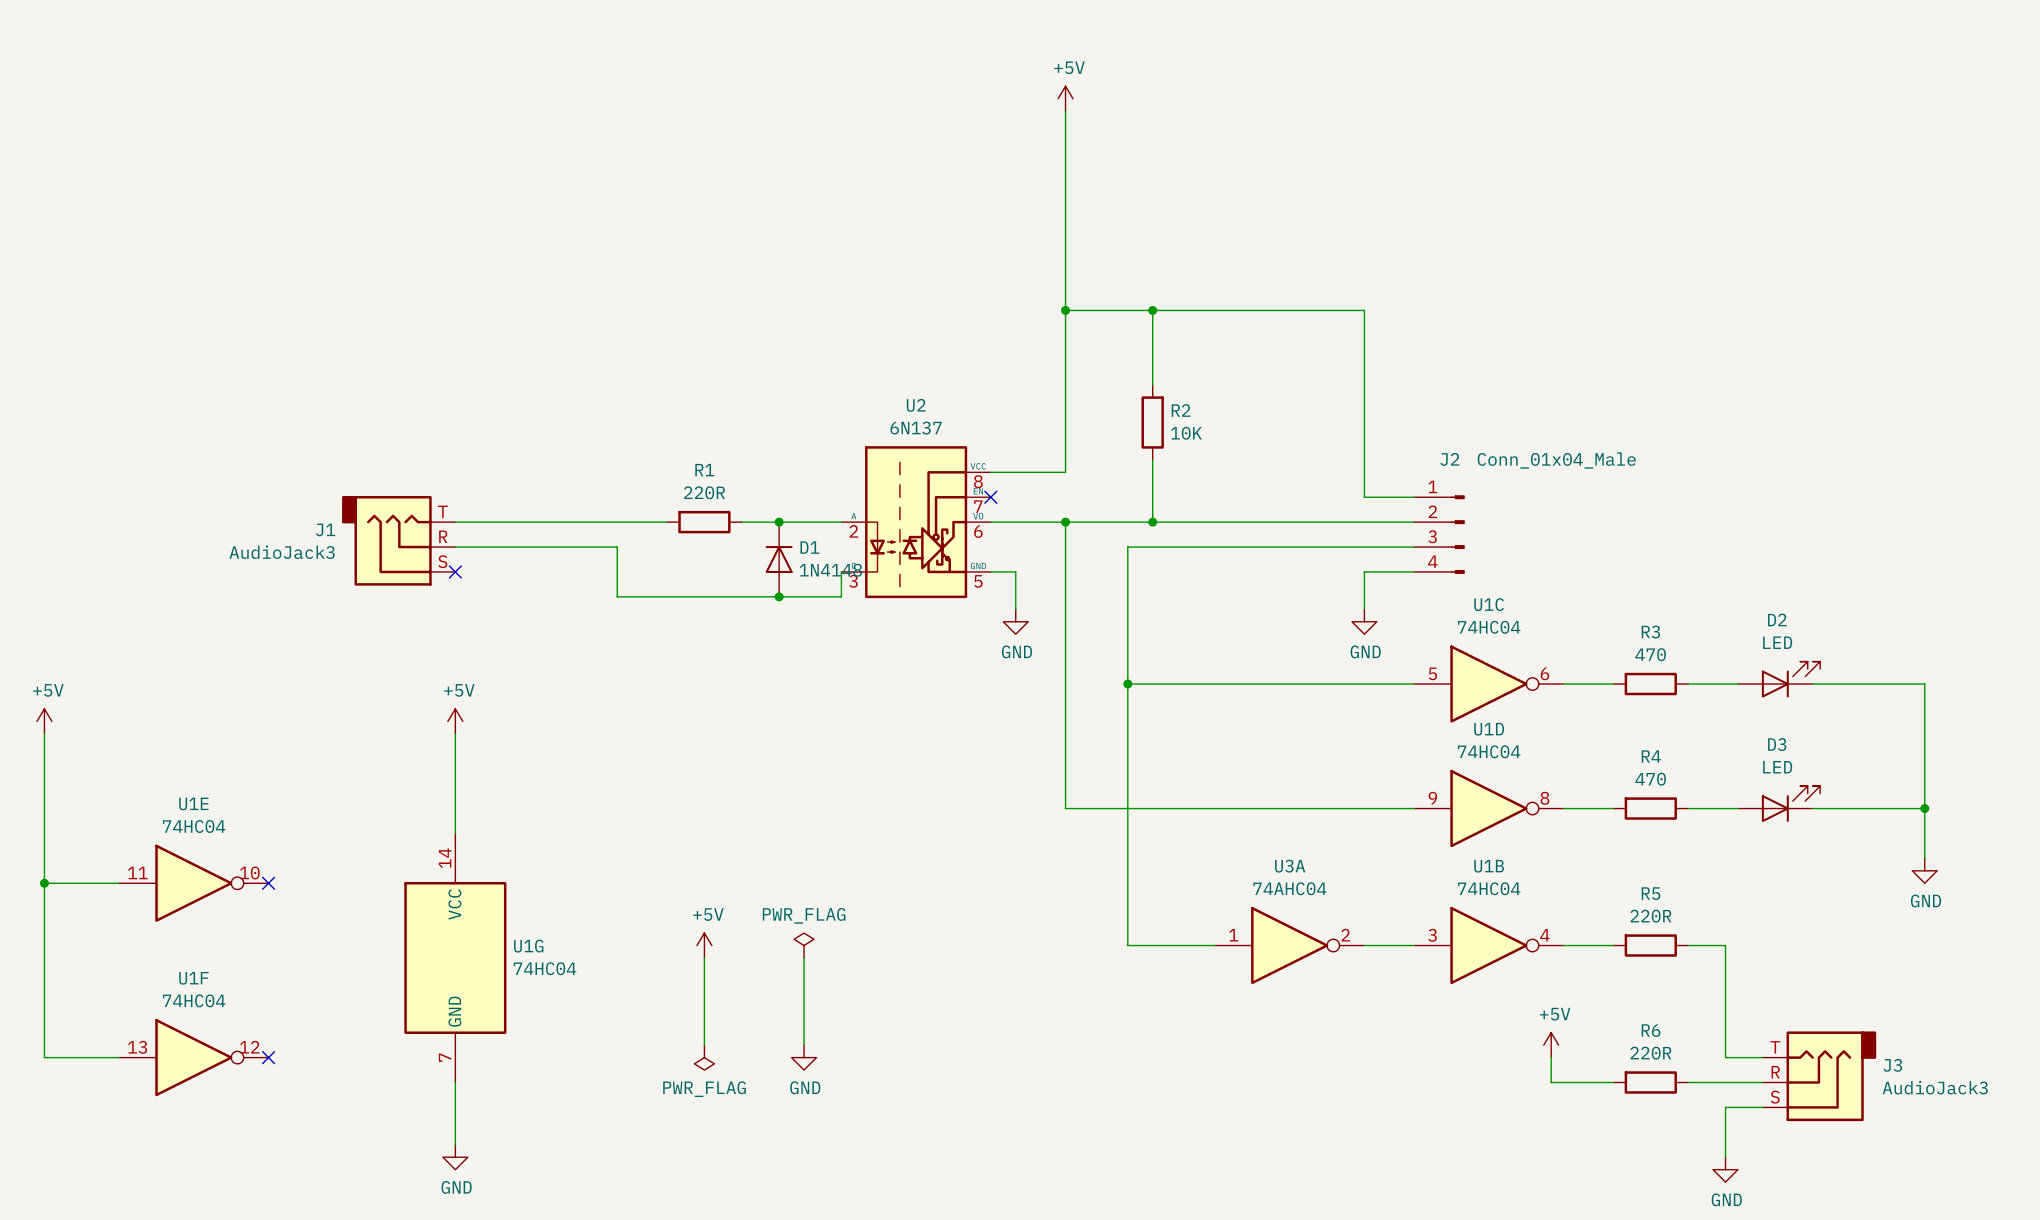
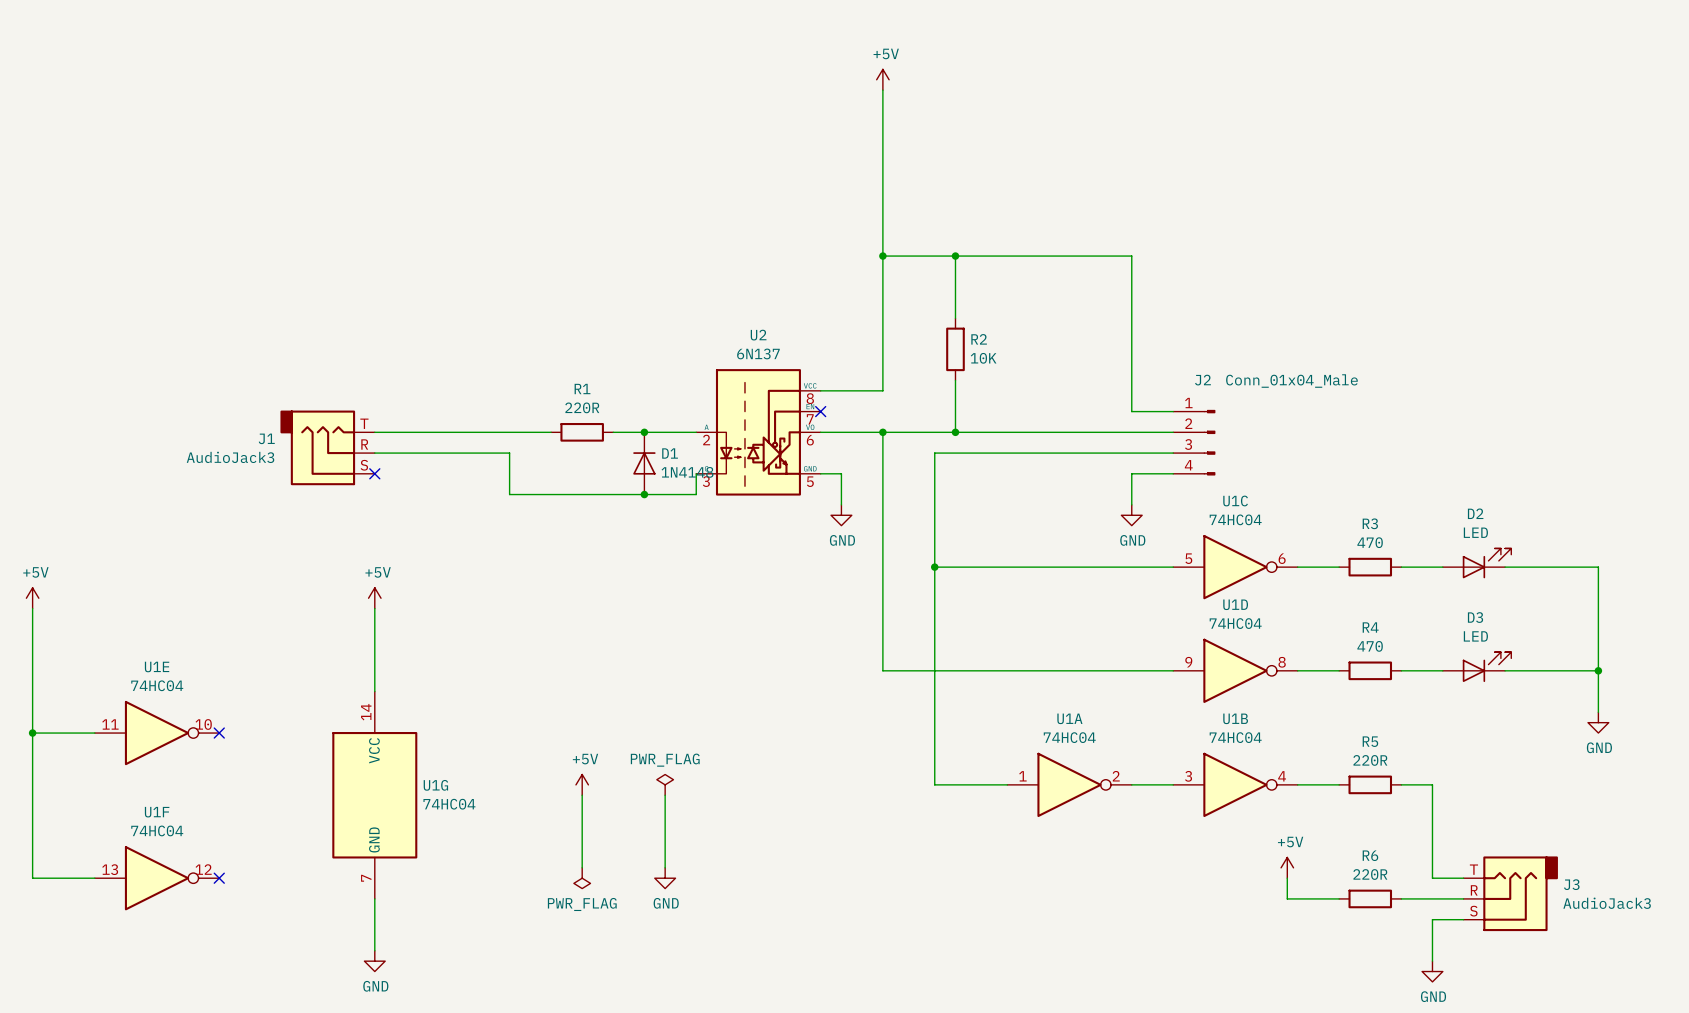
U3A name: U3A (1290, 866) -> U1A (1069, 718)
U3A value: 74AHC04 (1289, 888) -> 74HC04 (1069, 737)

